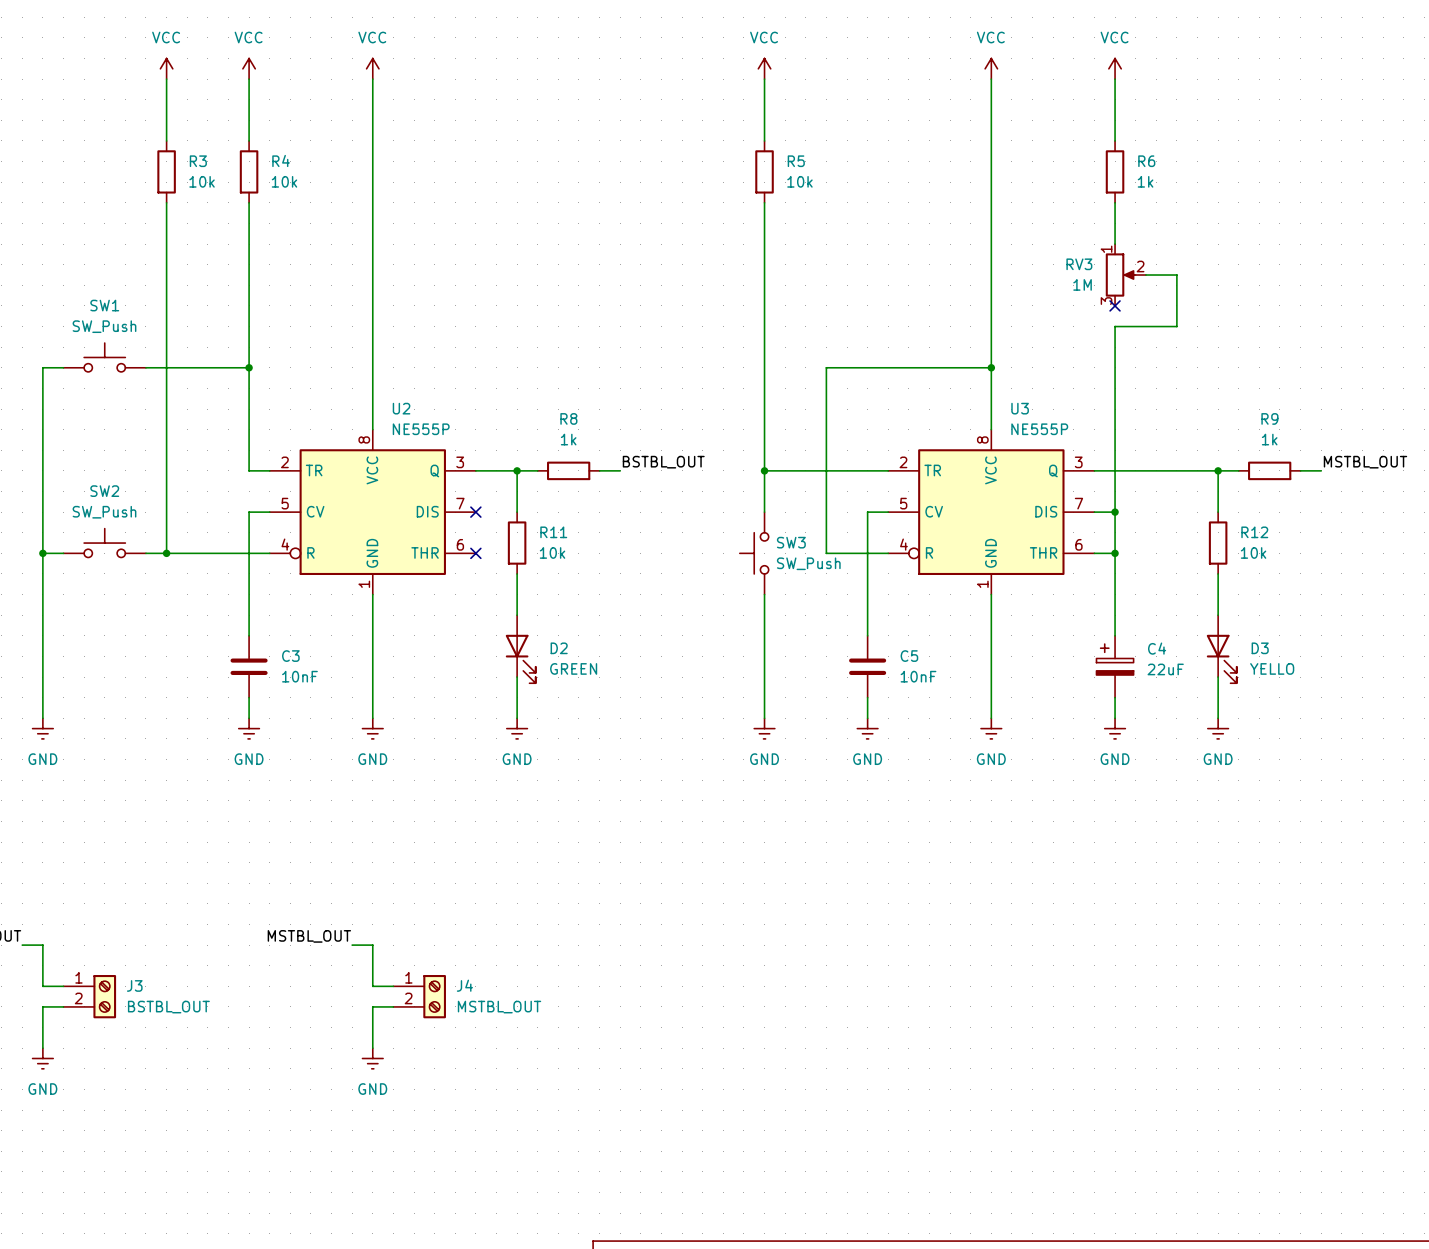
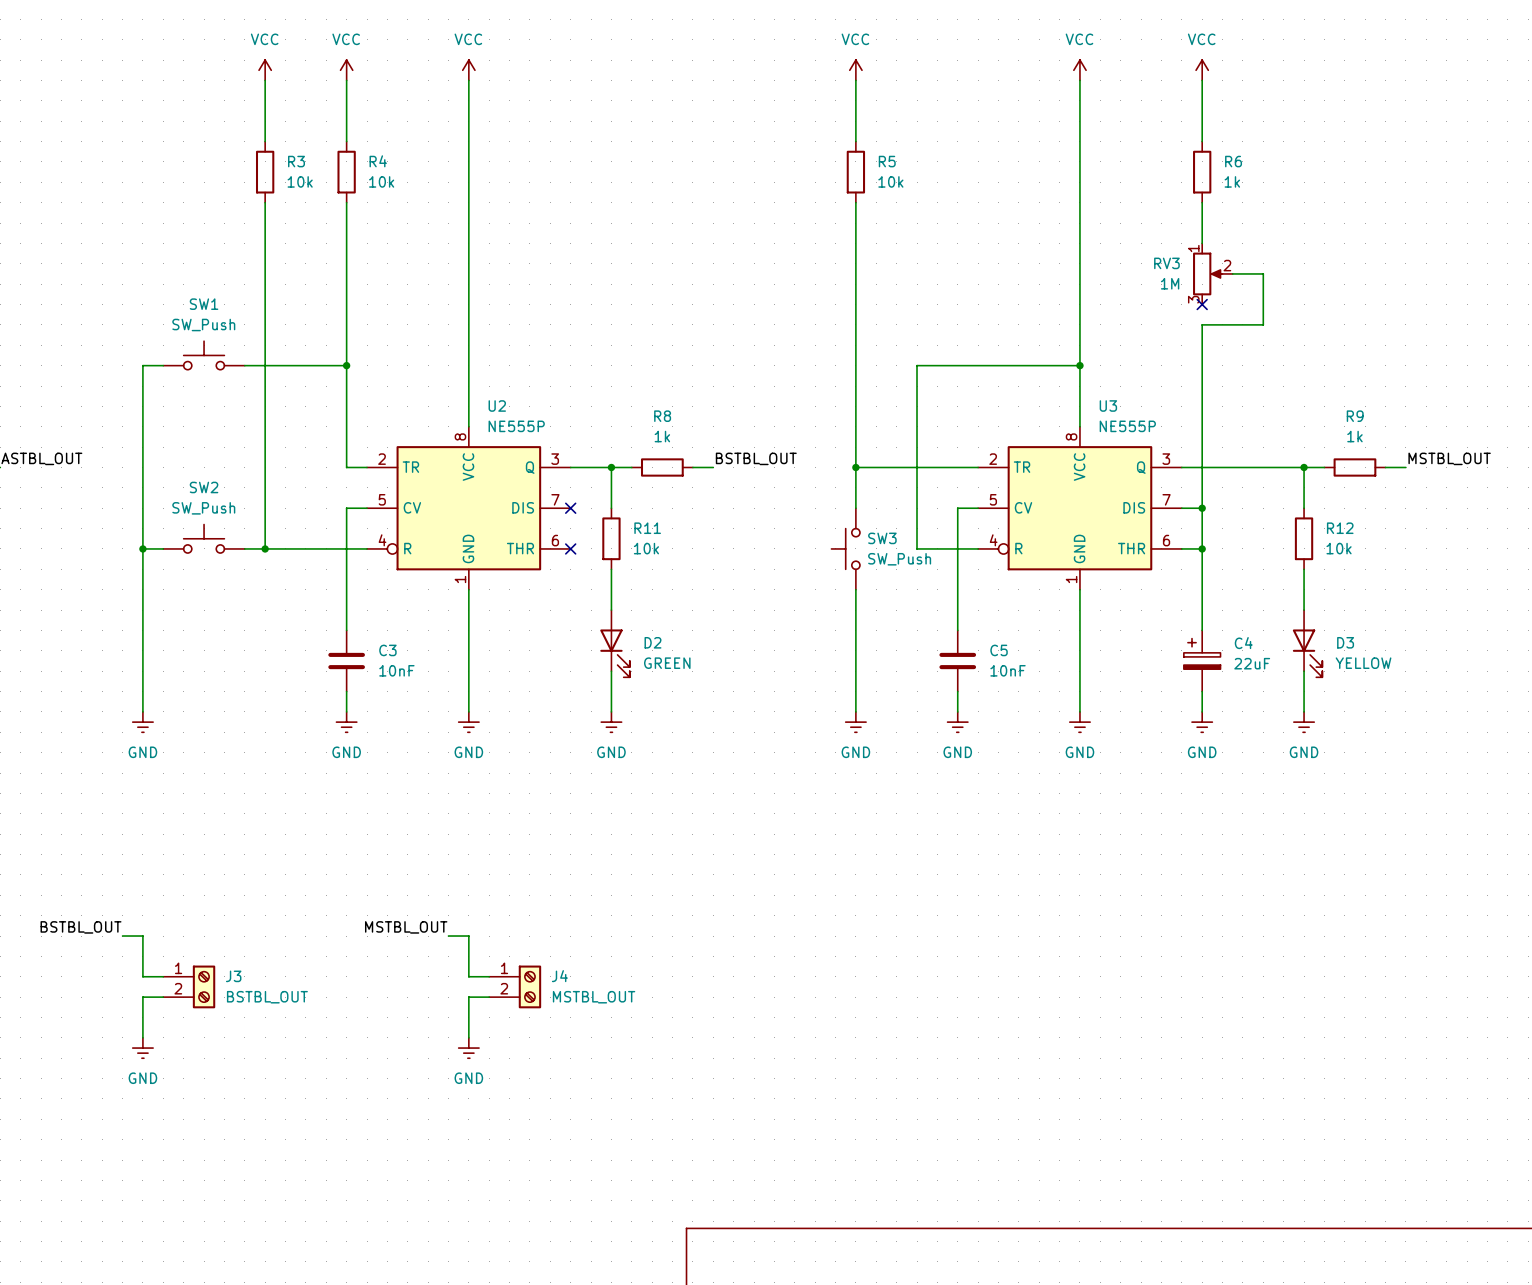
D3 value: YELLO (1272, 668) -> YELLOW (1363, 663)

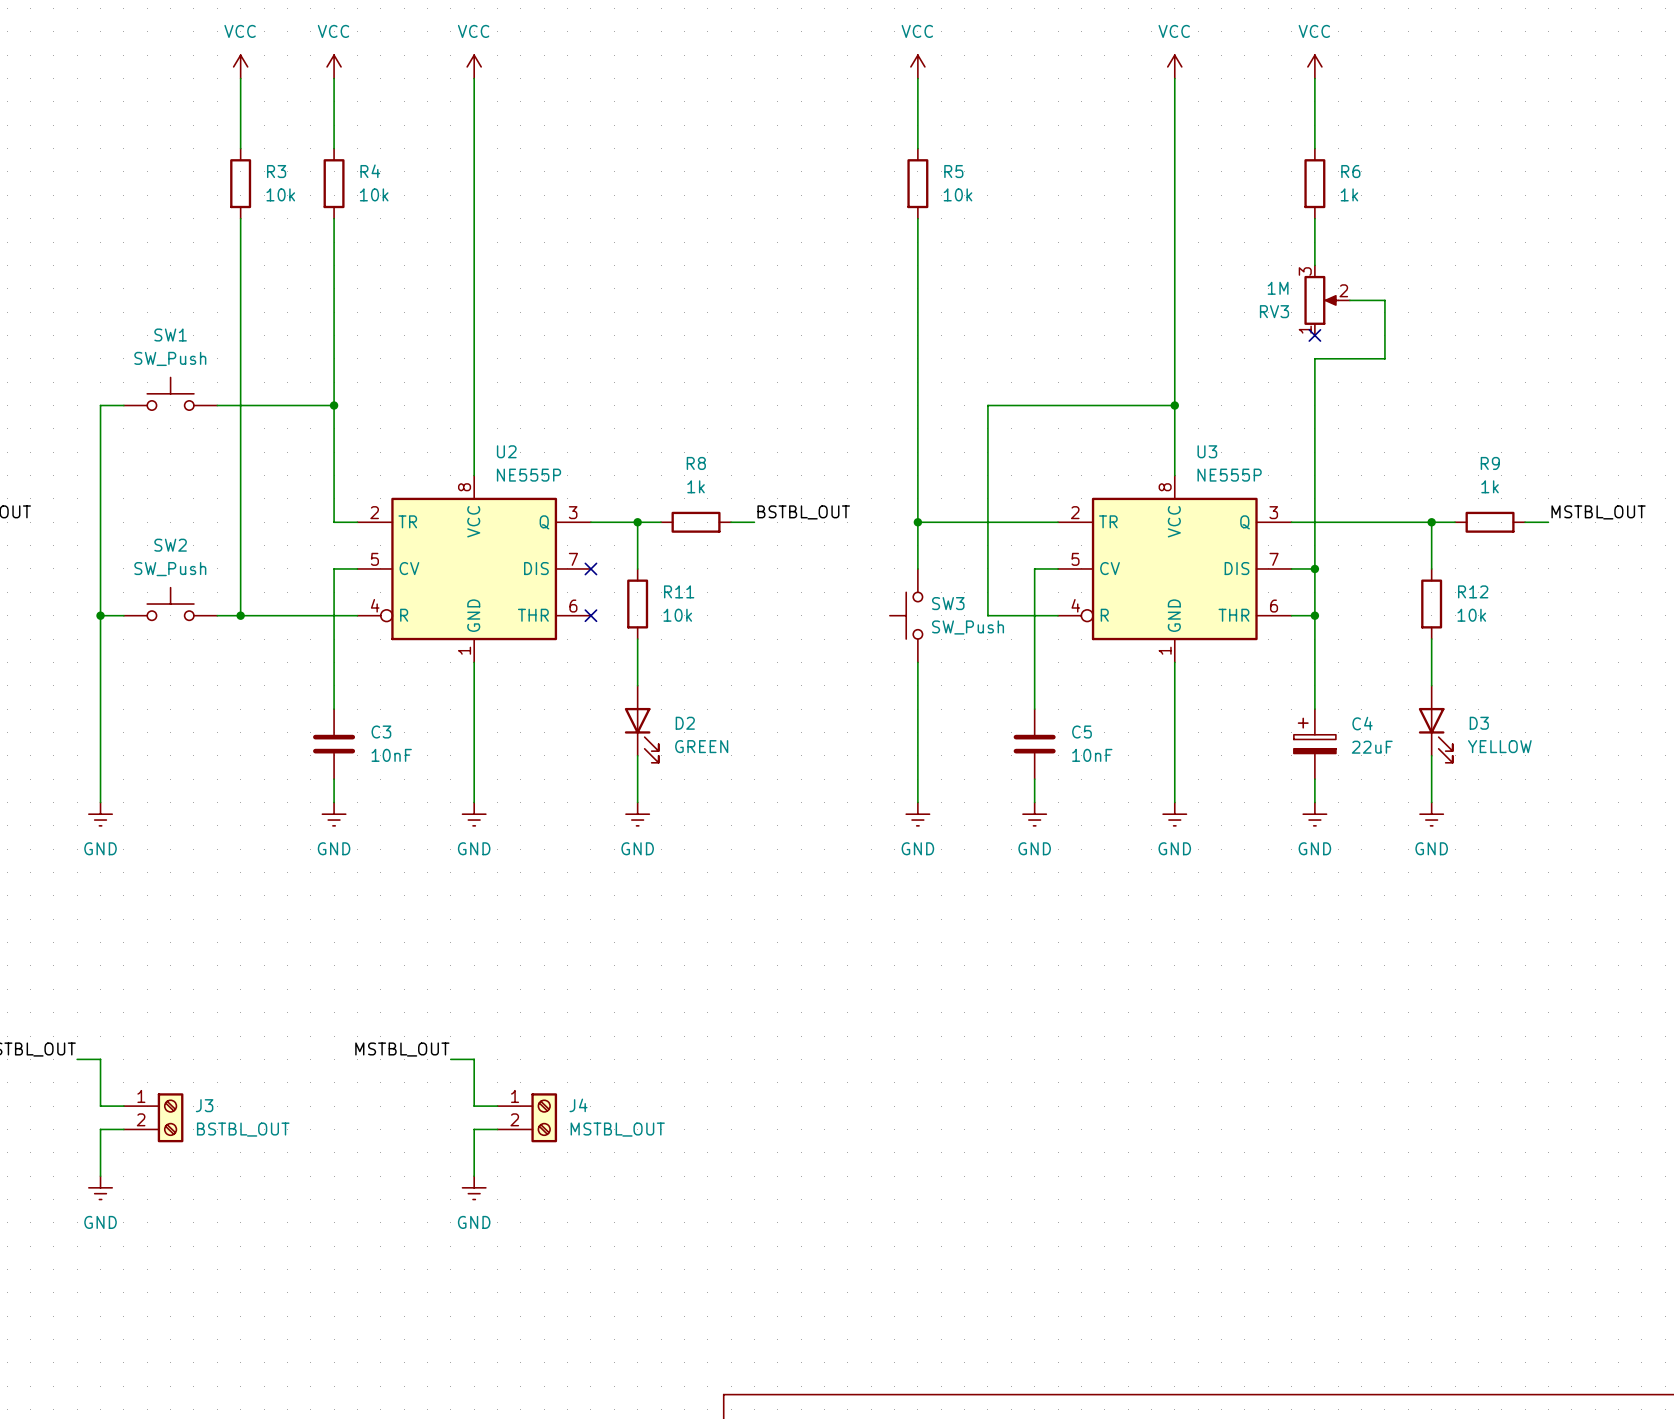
RV3 flip: as is (1207, 273) -> up-down (1321, 300)

